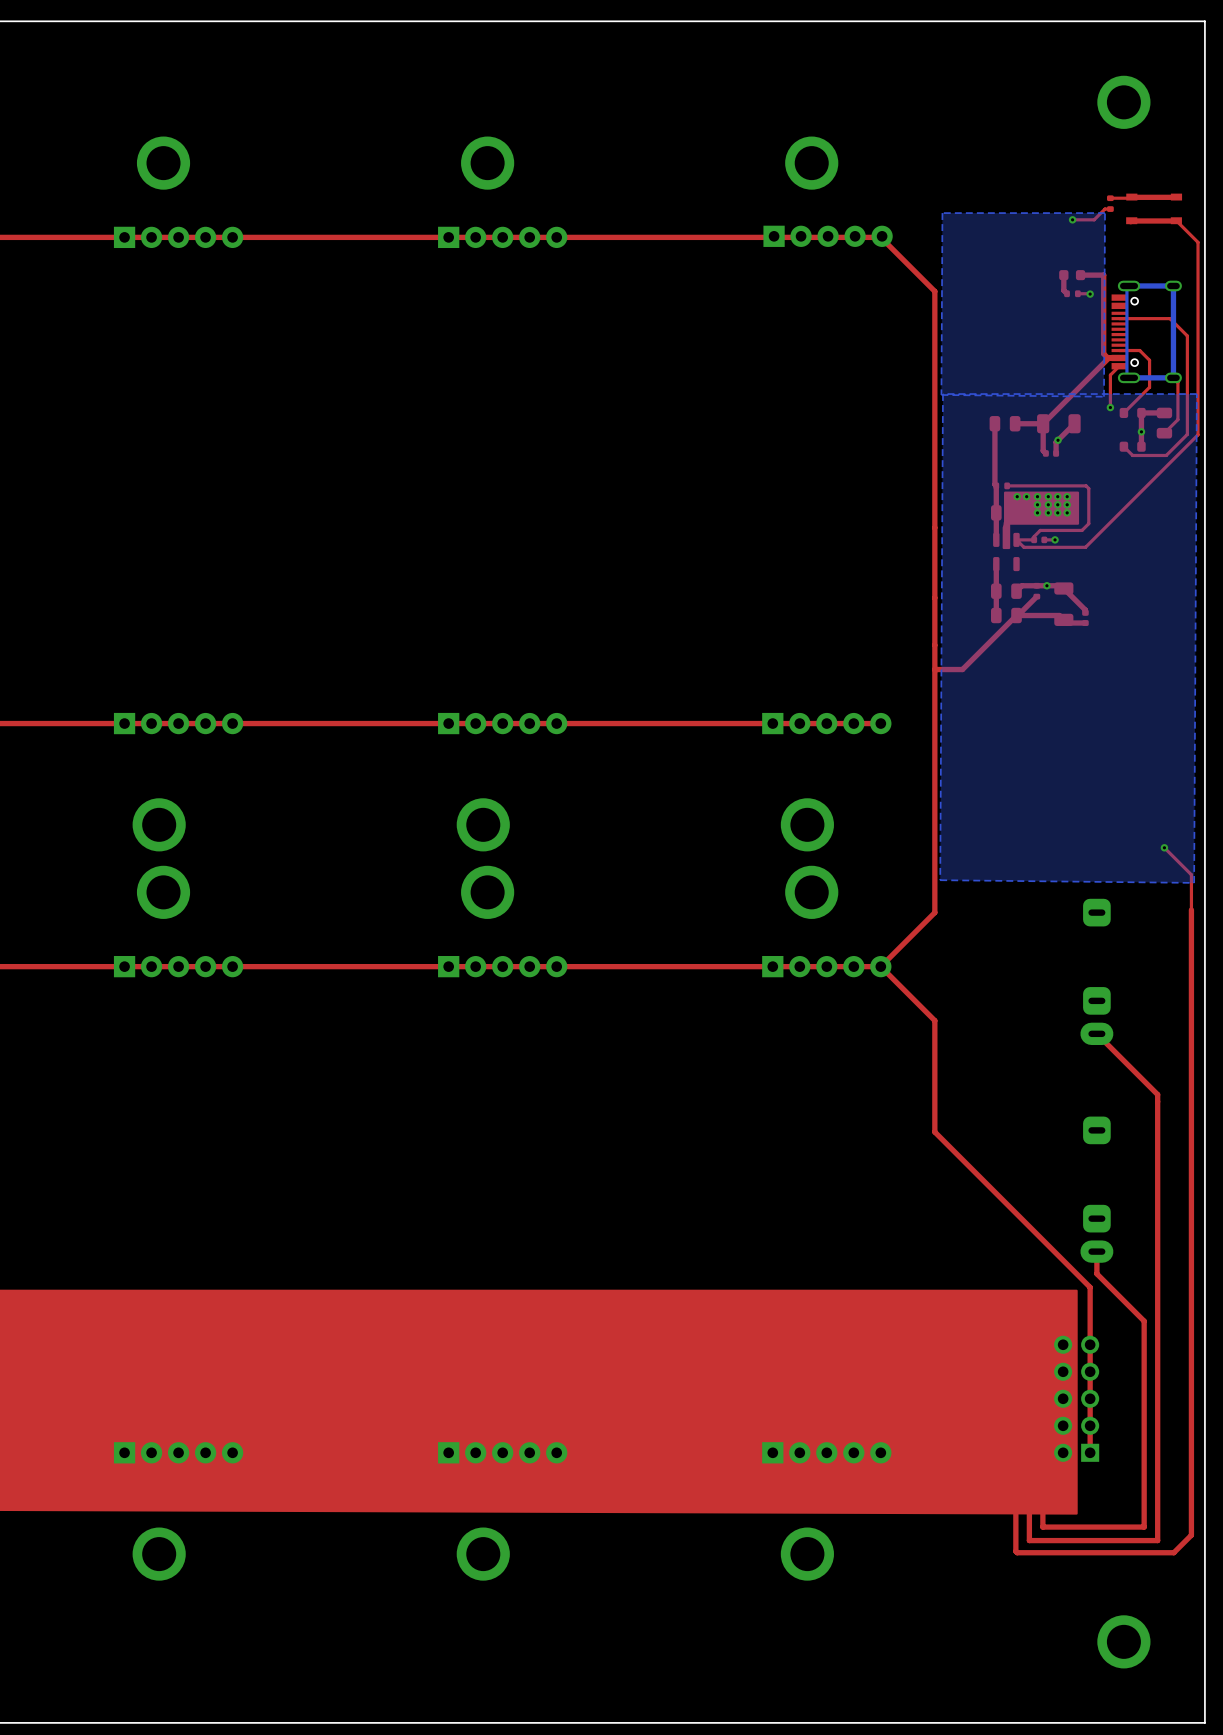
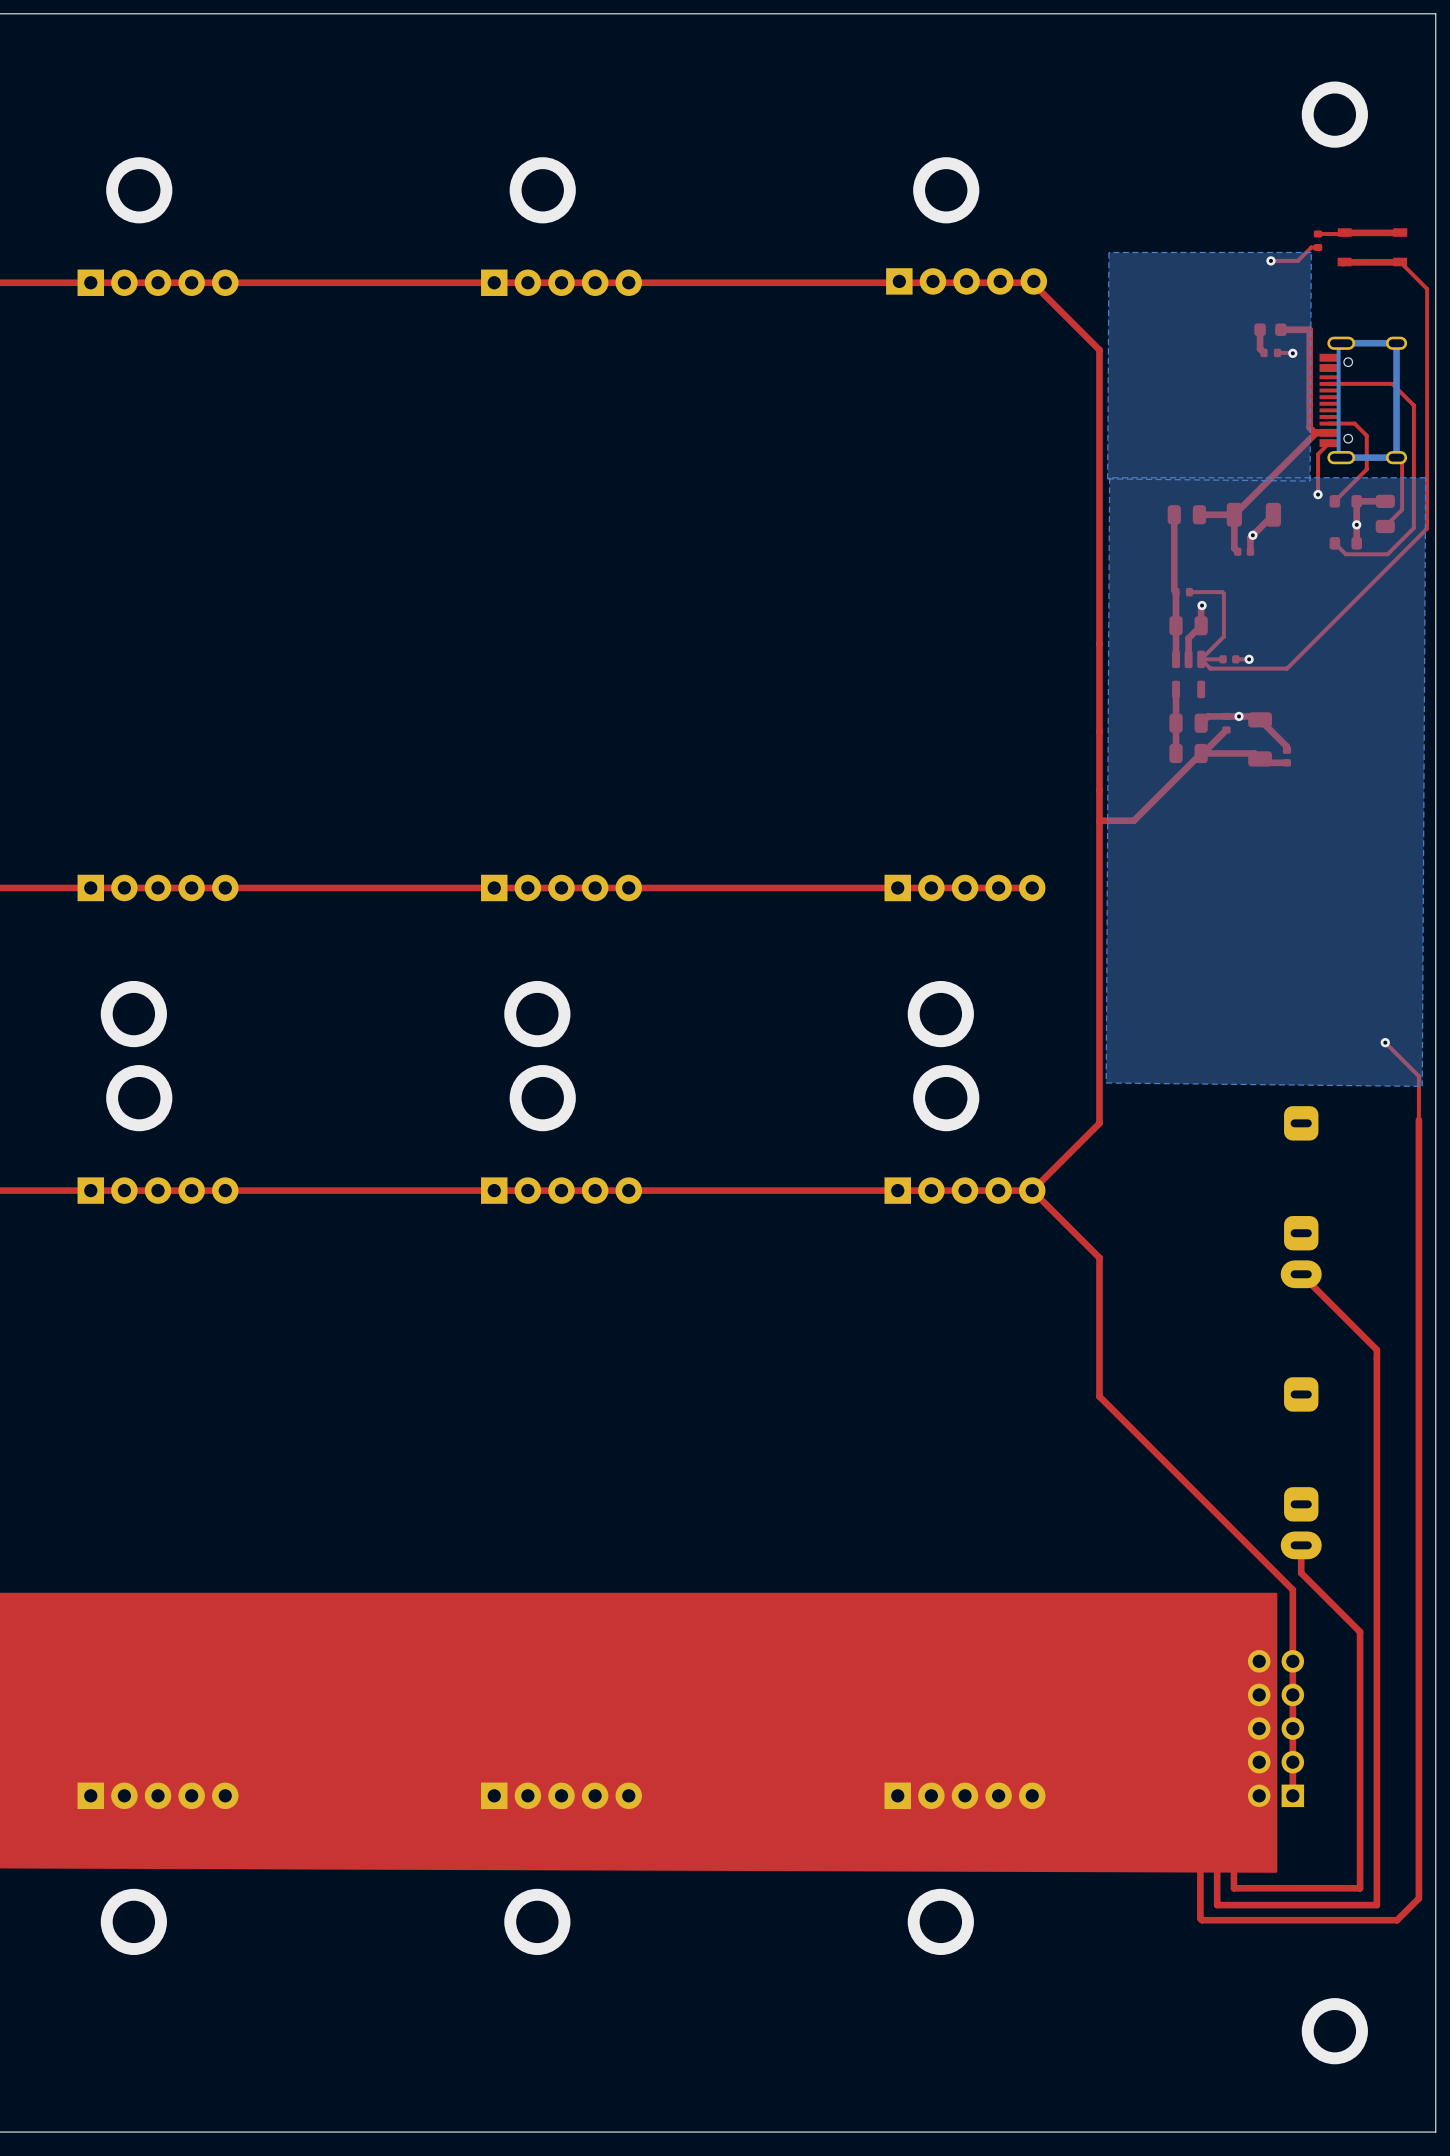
top track: (1033, 485) (1086, 485) (1088, 488) (1088, 523) (1082, 530) (1040, 530) (1034, 536) (1034, 539) -> (1222, 592) (1223, 593) (1223, 636) (1201, 659)
drawing: [1002, 491, 1080, 550] -> none
via: (1026, 496) -> none
via: (1037, 496) -> none
via: (1048, 496) -> none
via: (1057, 496) -> none
via: (1067, 496) -> none
via: (1037, 504) -> none
via: (1048, 504) -> none
via: (1057, 504) -> none
via: (1067, 504) -> none
via: (1037, 512) -> none
via: (1048, 512) -> none
via: (1057, 512) -> none
via: (1067, 512) -> none

